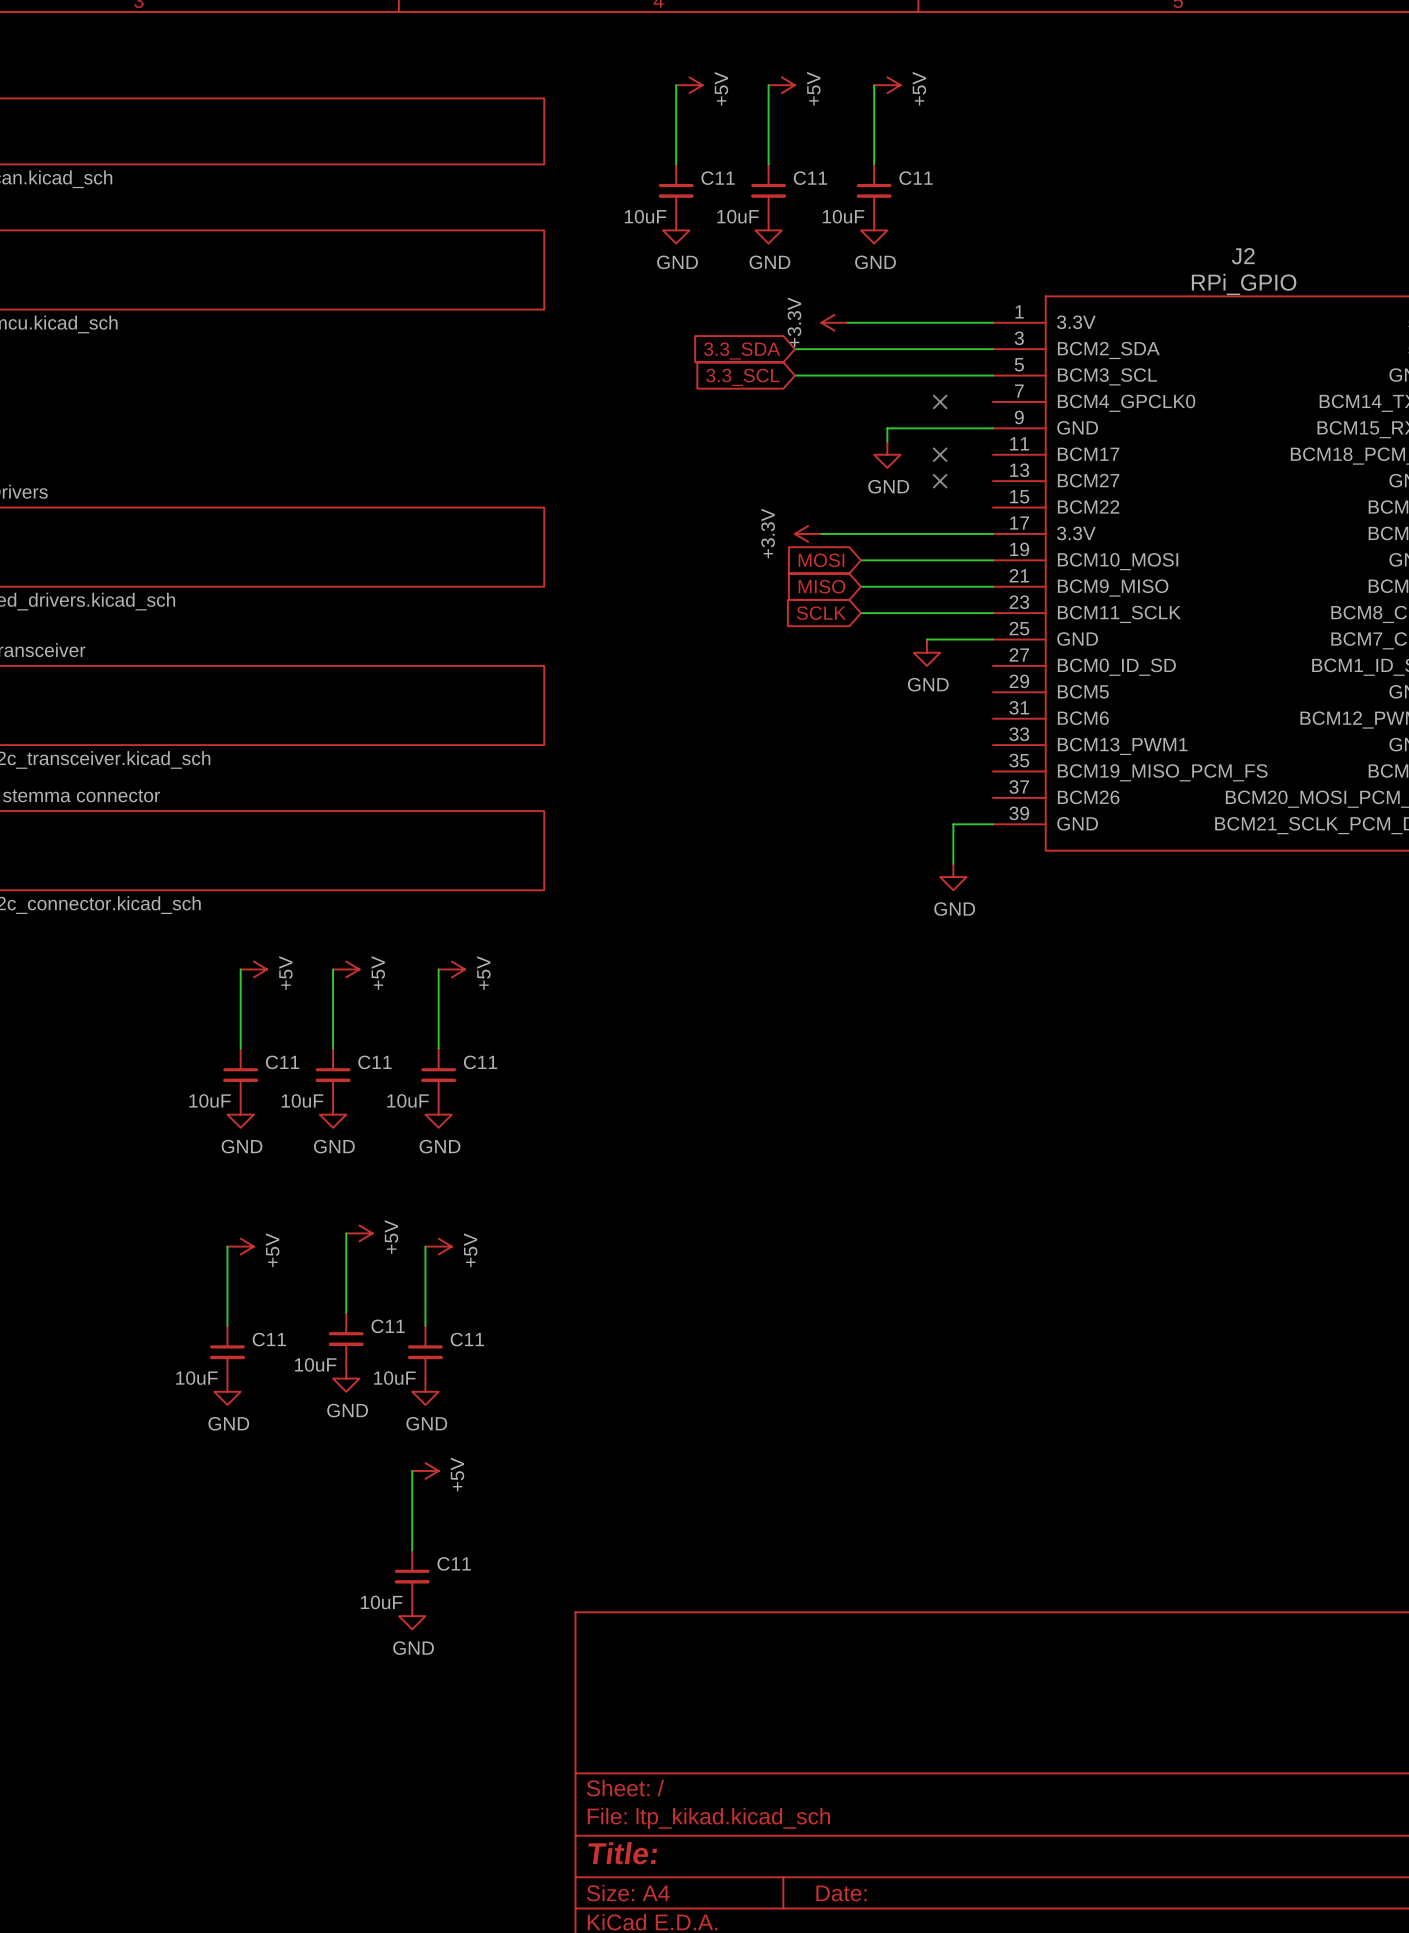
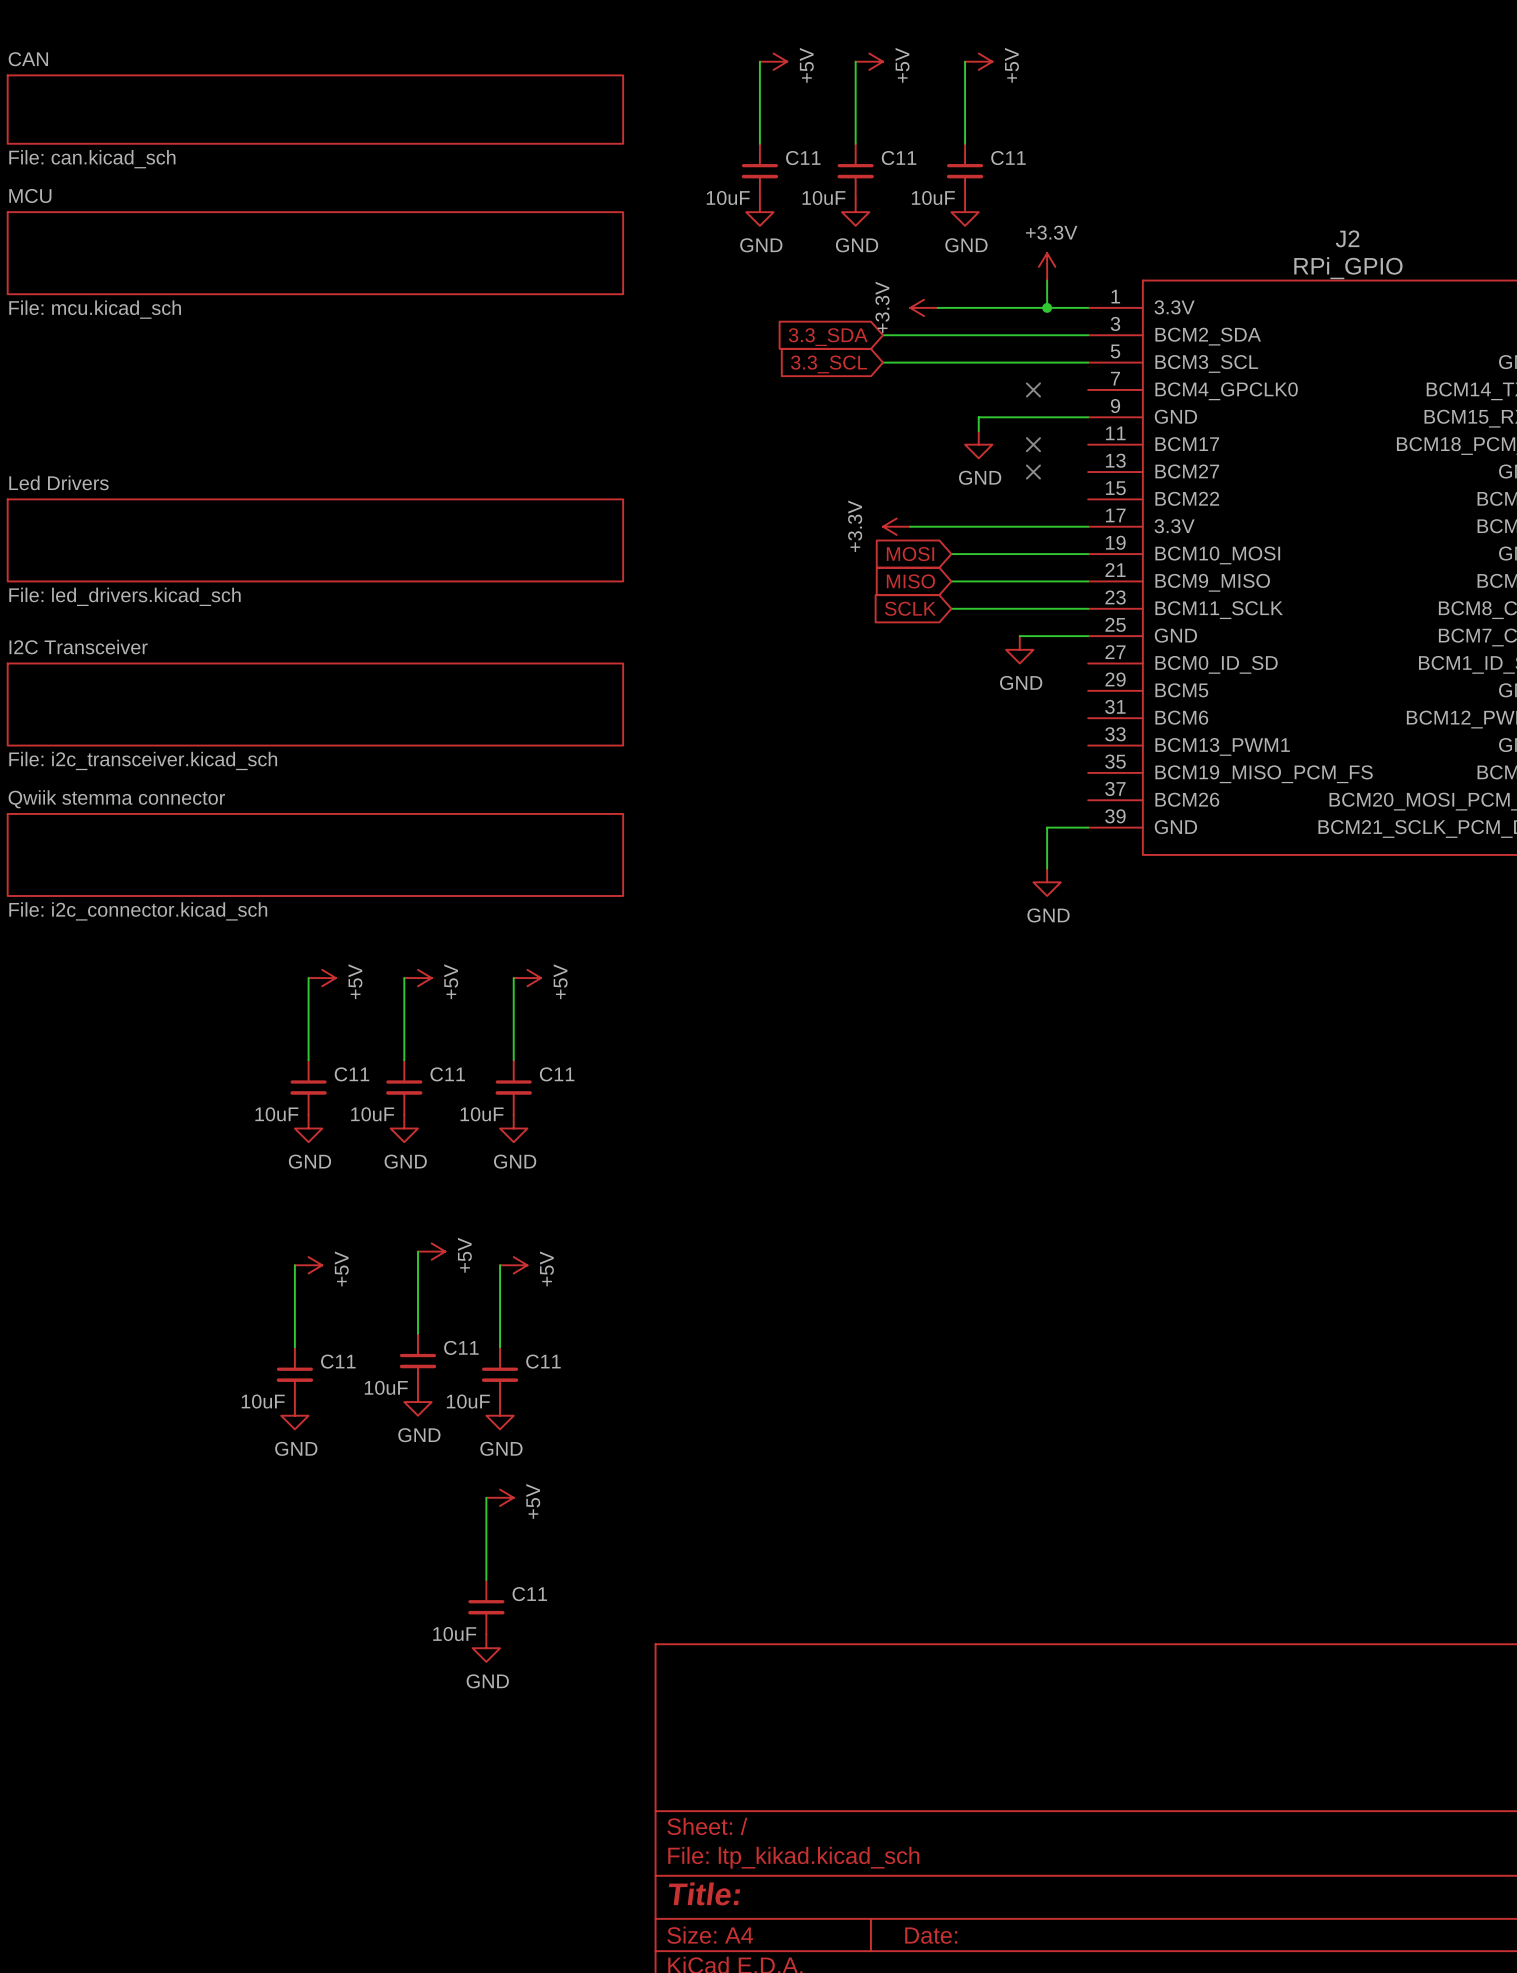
power symbol: none -> +3.3V (1047, 266)
wire: none -> (1047, 280) (1047, 307)
junction: none -> (1047, 307)

